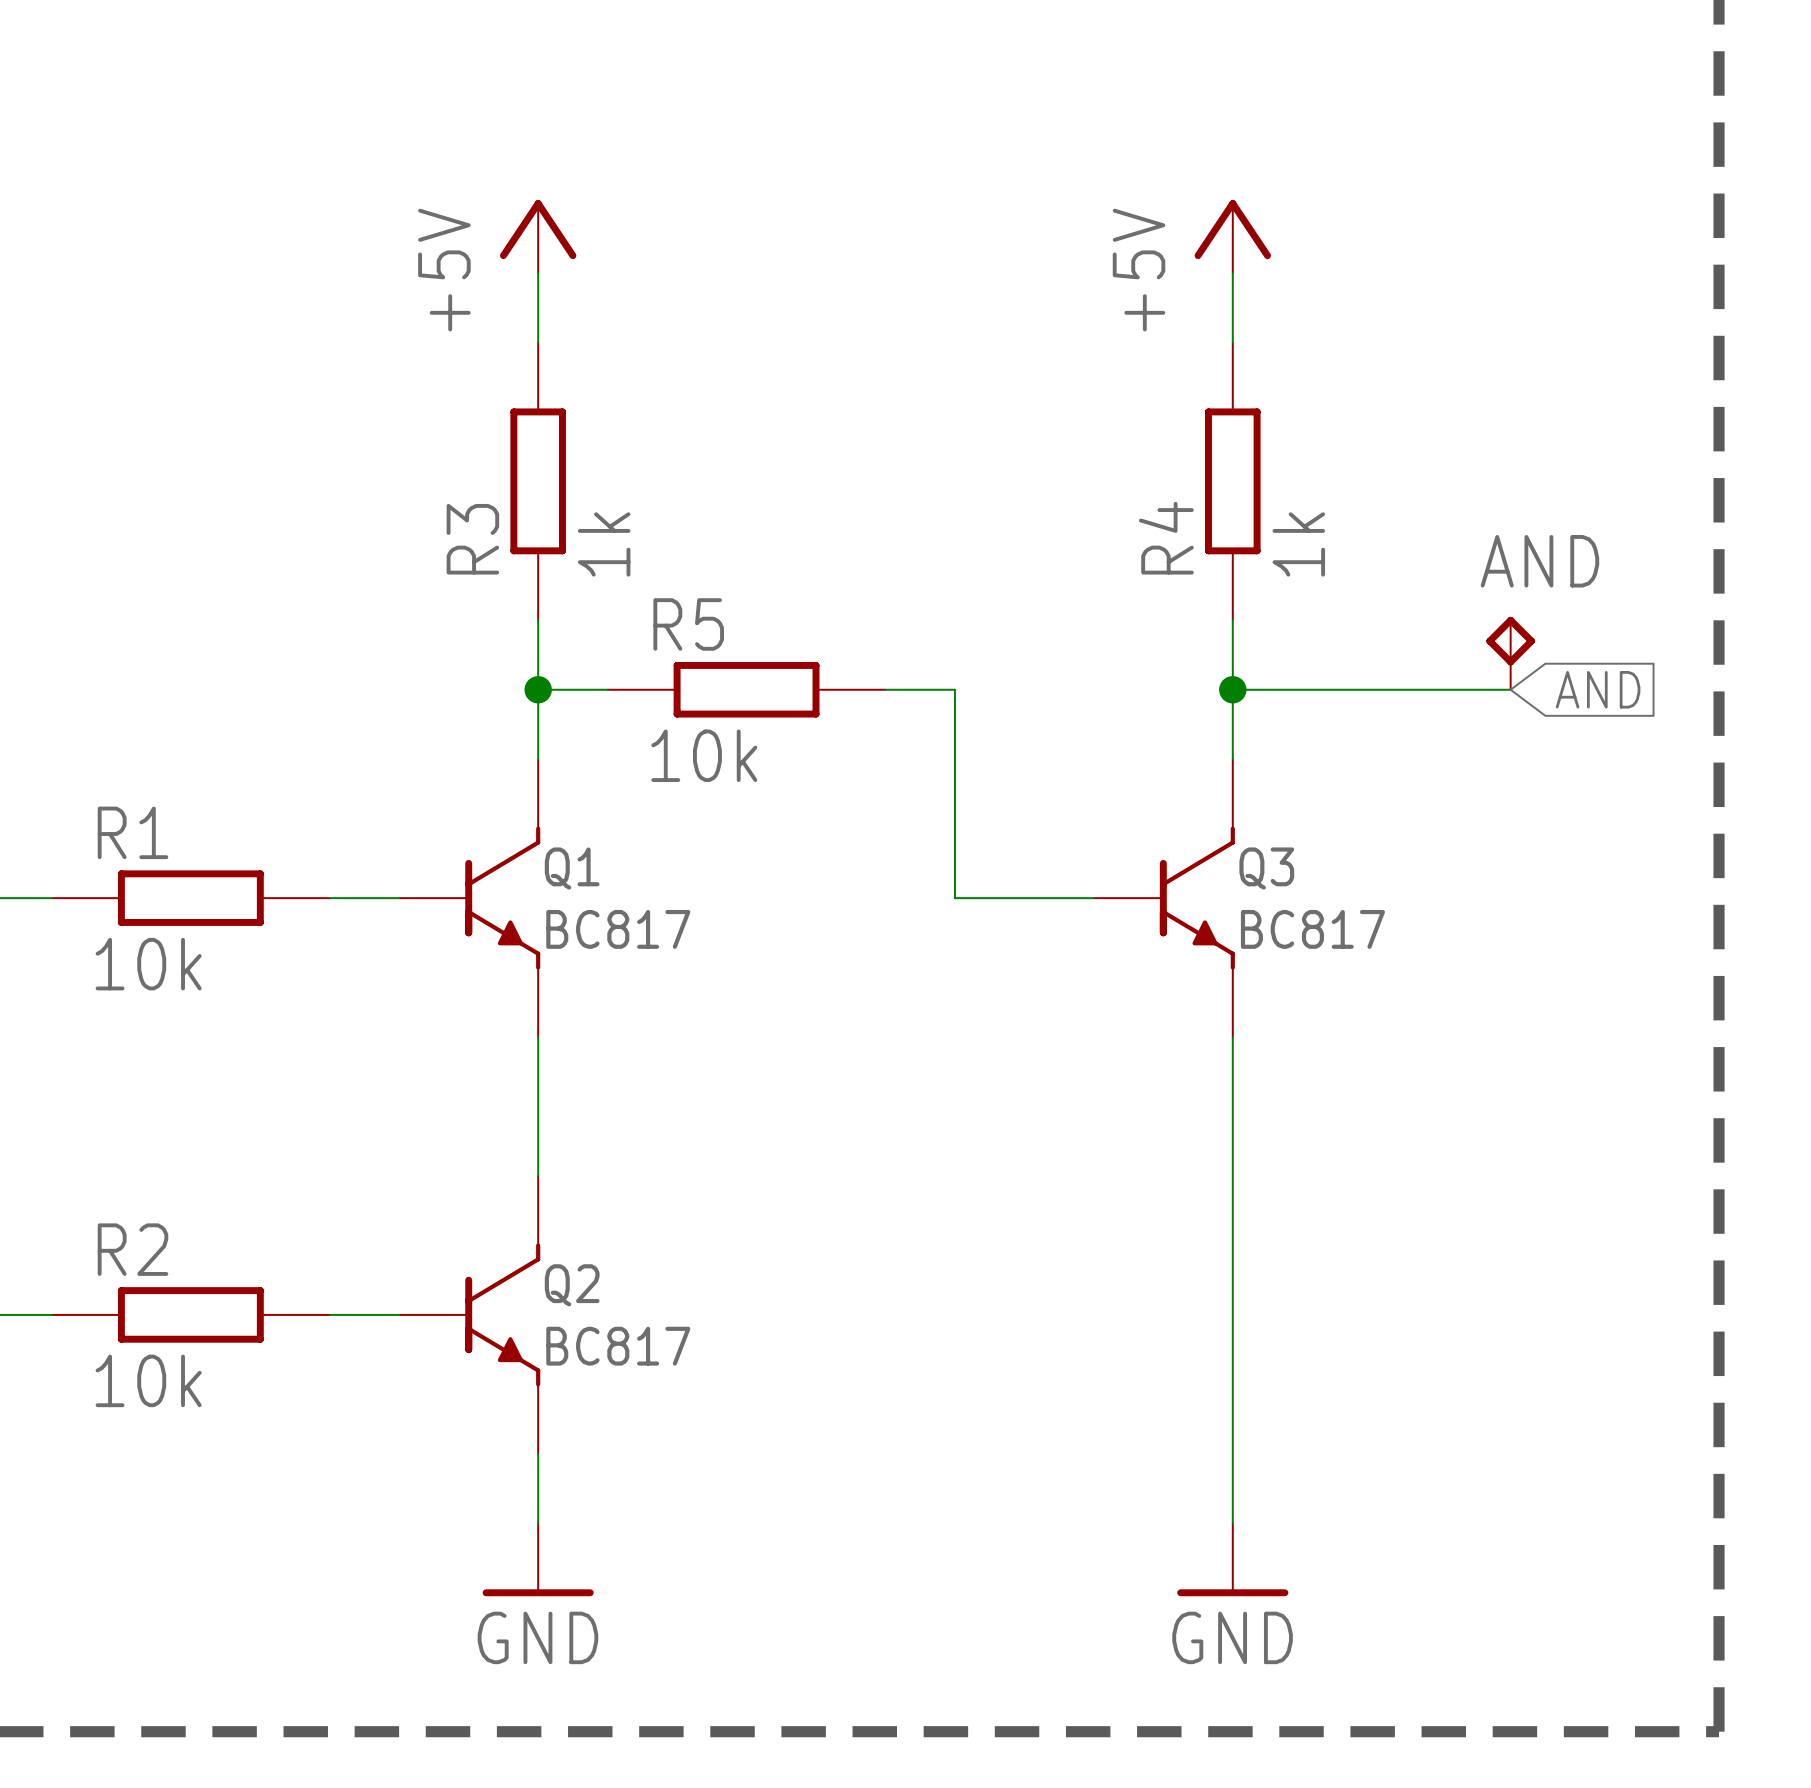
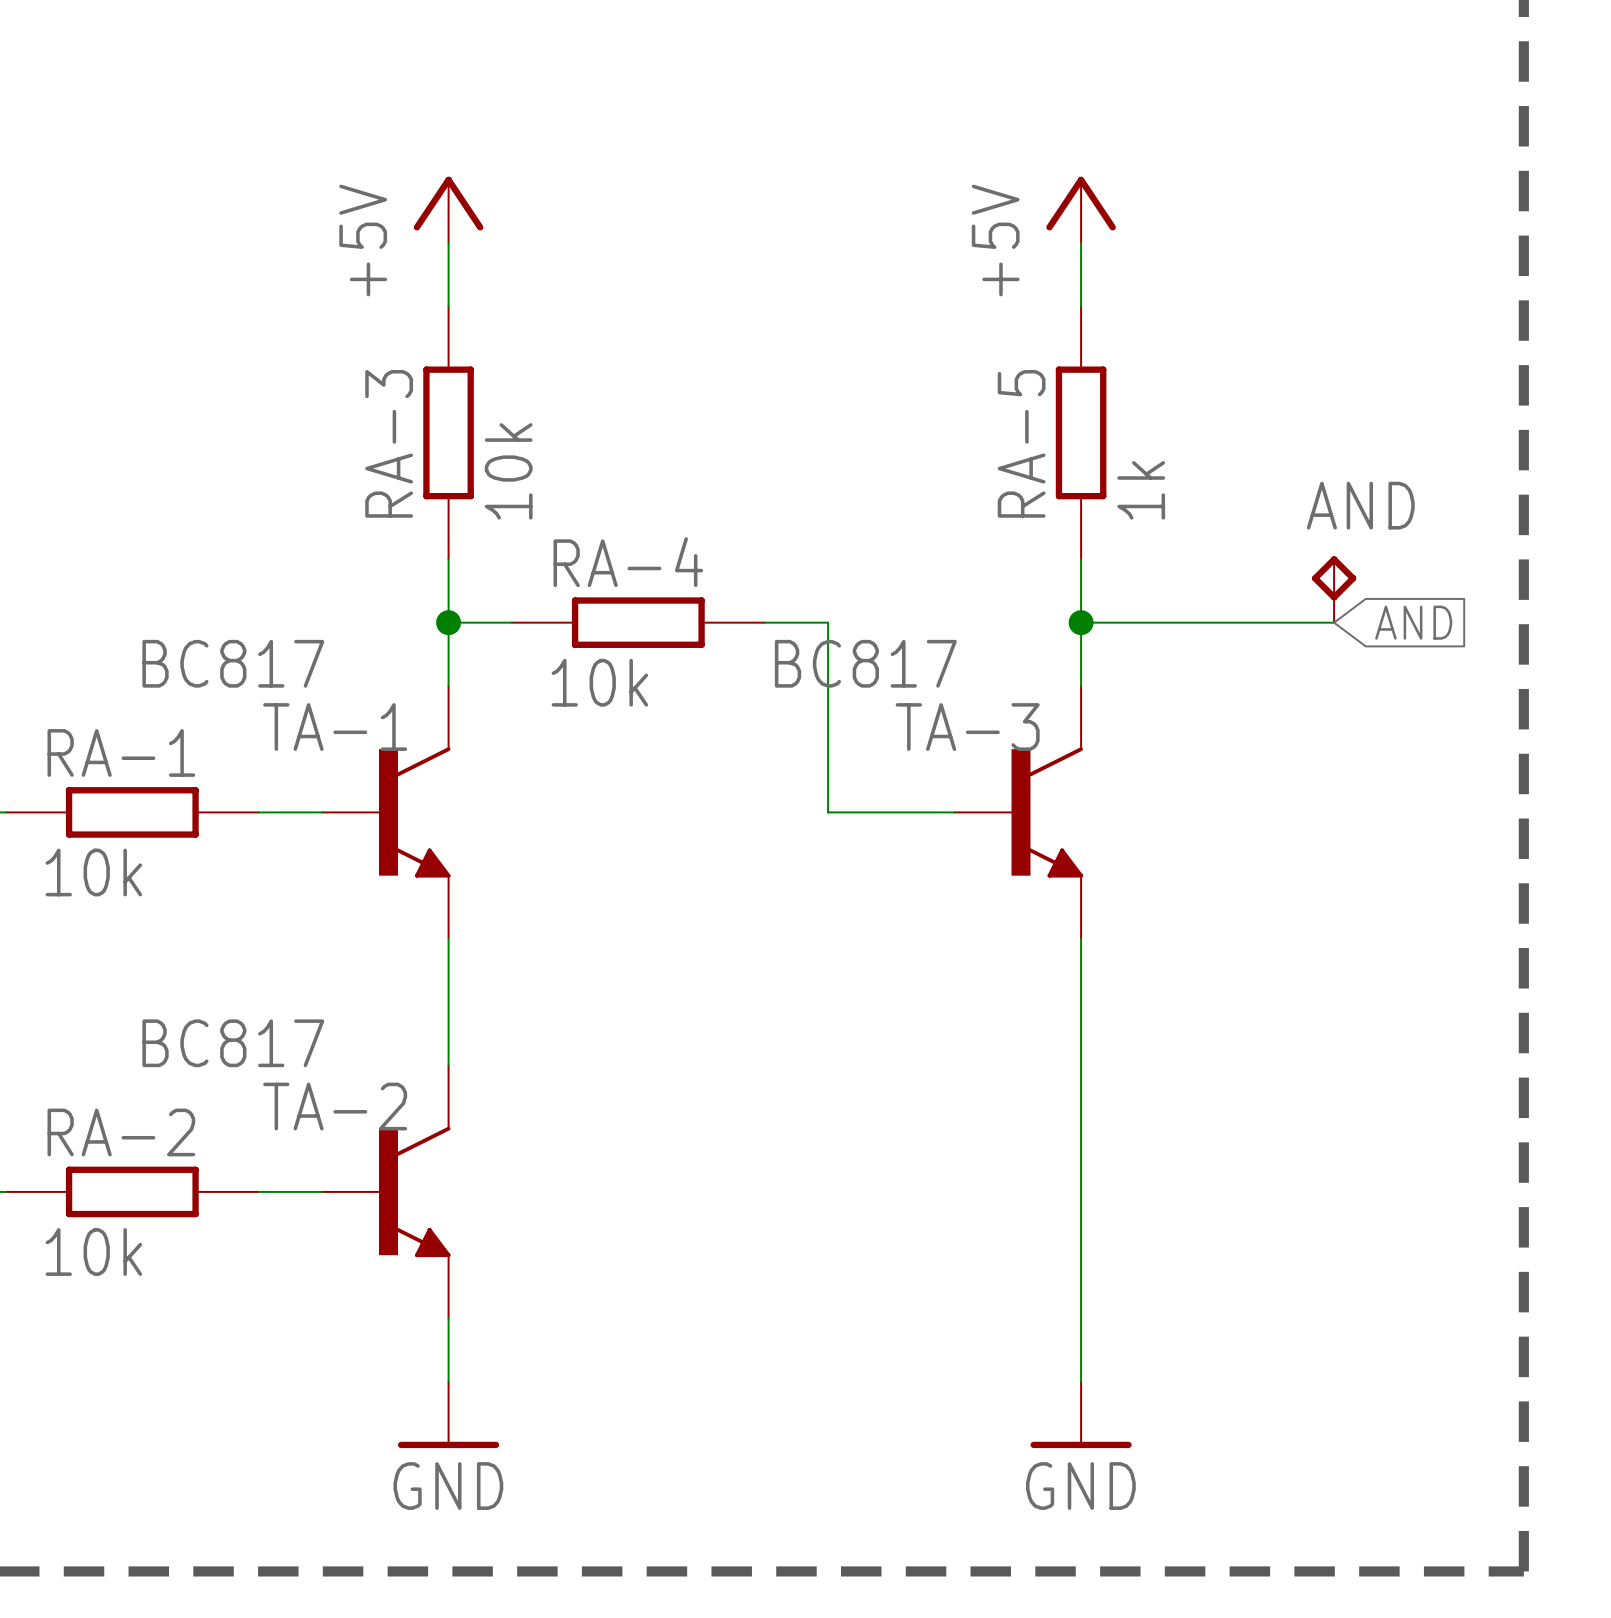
R4 name: R4 (1166, 538) -> RA-5 (1021, 443)
R3 name: R3 (472, 539) -> RA-3 (389, 443)
R3 value: 1k (604, 544) -> 10k (508, 471)
R5 name: R5 (688, 624) -> RA-4 (628, 562)
R1 name: R1 (132, 832) -> RA-1 (121, 752)
Q1: BC817 (469, 898) -> none
TA-1: none -> BC817 (386, 812)
Q3: BC817 (1164, 898) -> none
TA-3: none -> BC817 (1018, 812)
R2 name: R2 (132, 1249) -> RA-2 (121, 1132)
Q2: BC817 (469, 1314) -> none
TA-2: none -> BC817 (386, 1191)

